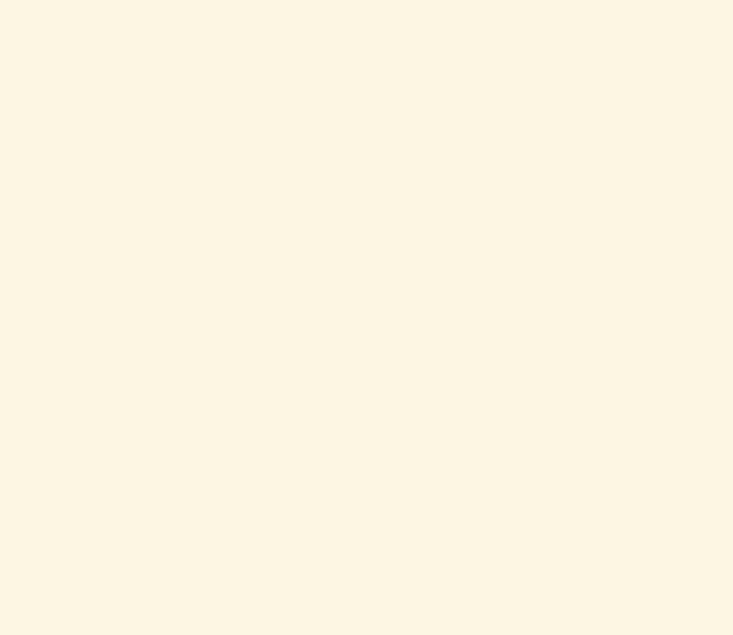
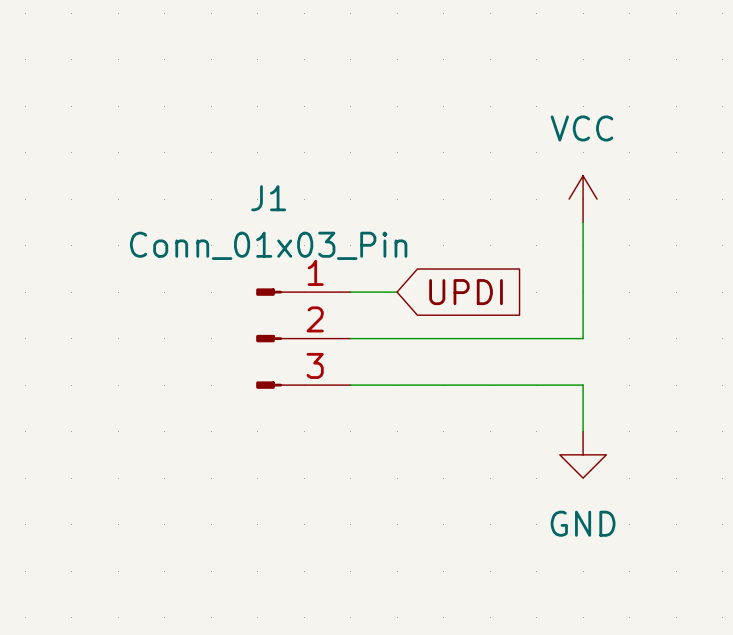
power symbol: none -> VCC (583, 199)
wire: none -> (583, 222) (583, 338) (350, 338)
wire: none -> (350, 292) (397, 292)
global label: none -> UPDI (466, 292)
J1: none -> Conn_01x03_Pin (303, 338)
wire: none -> (350, 385) (583, 385) (583, 431)
power symbol: none -> GND (583, 454)

